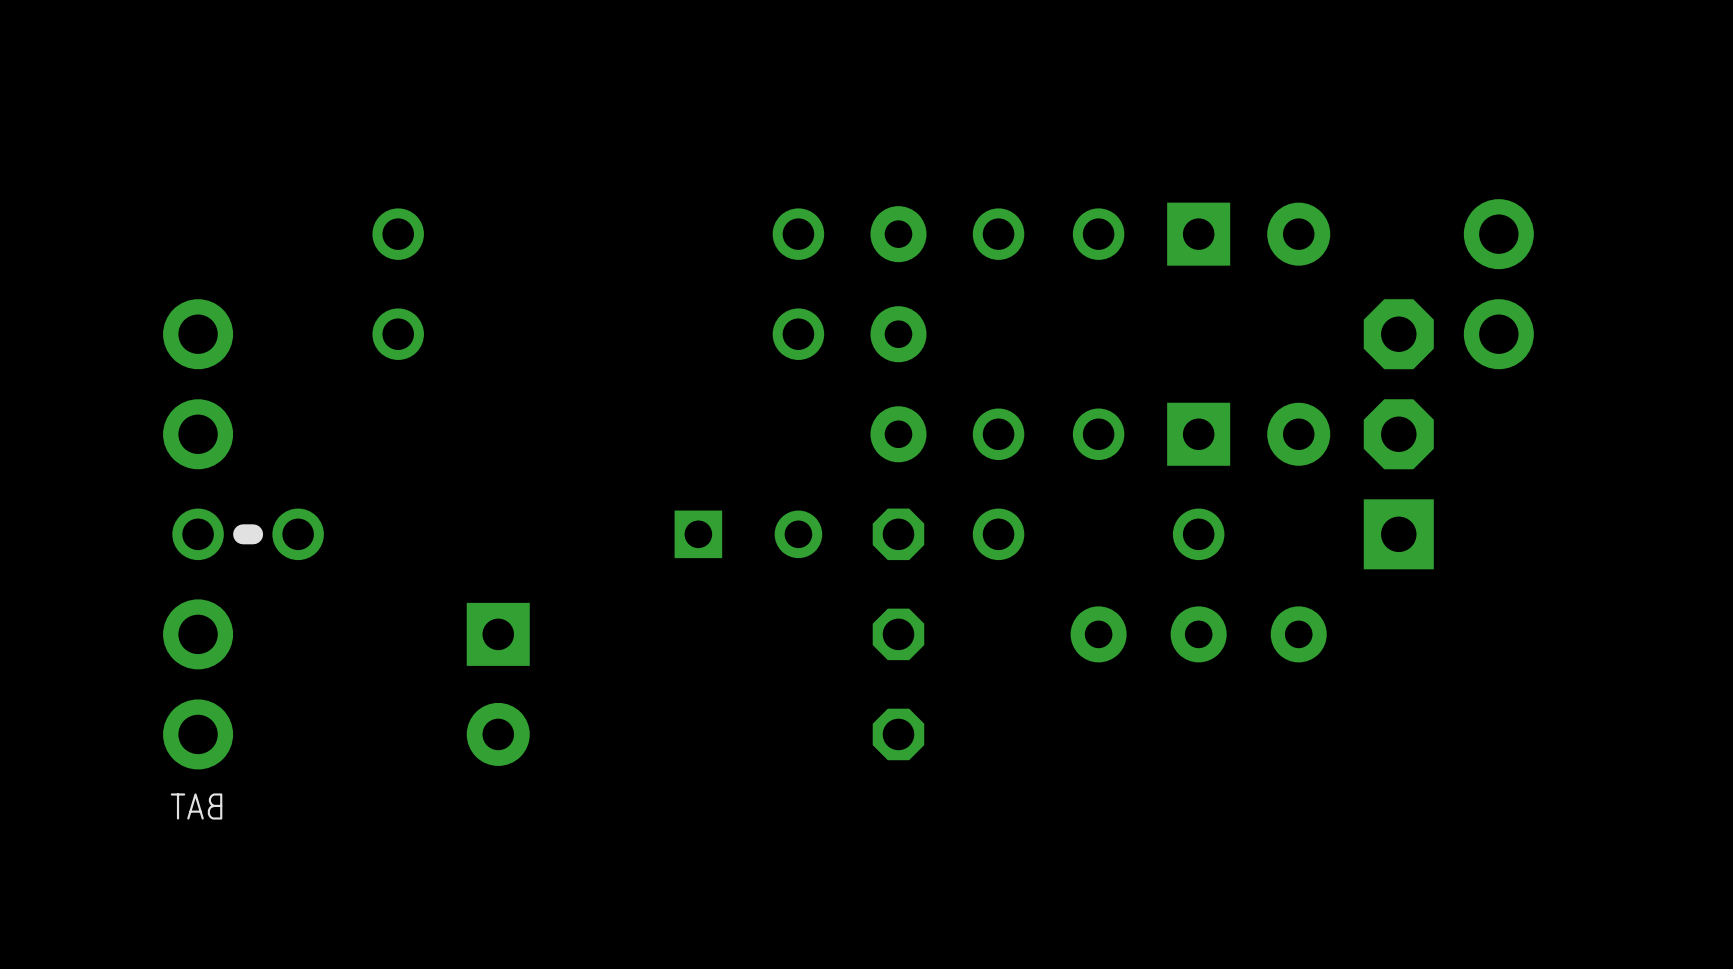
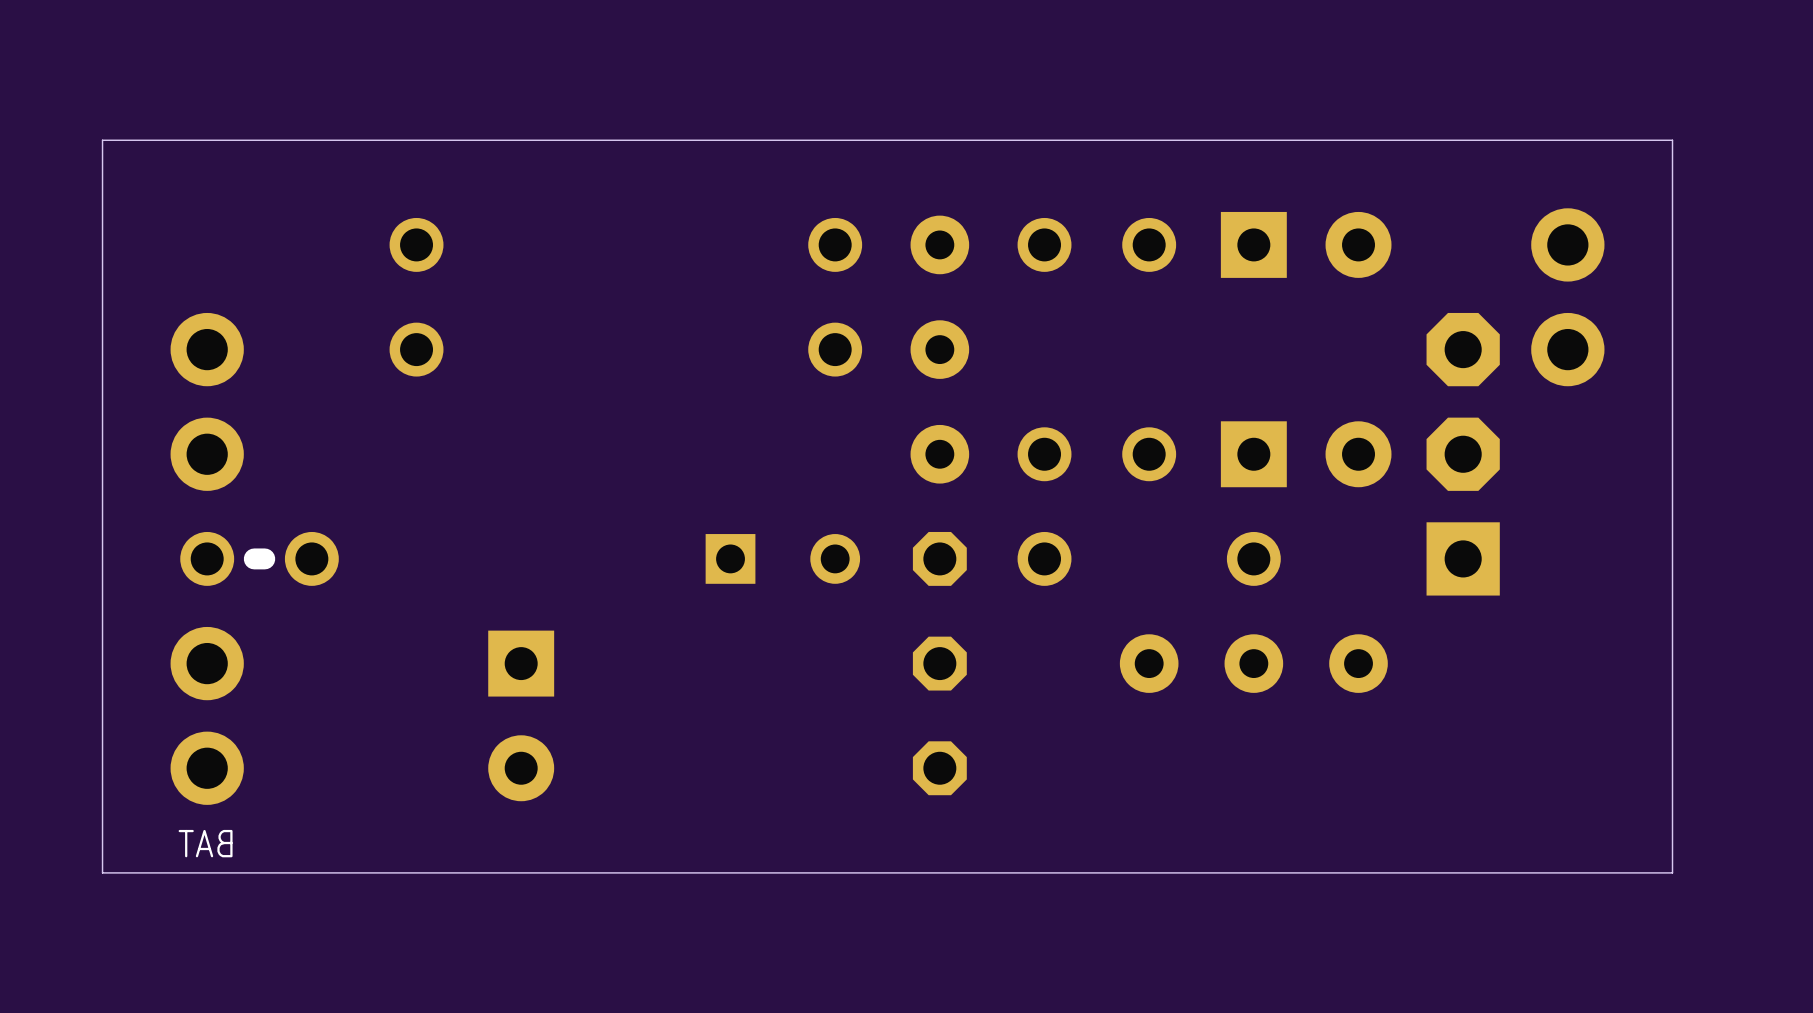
board edge: none -> (1672, 140) (102, 140) (102, 872) (1672, 872) (1672, 140)

